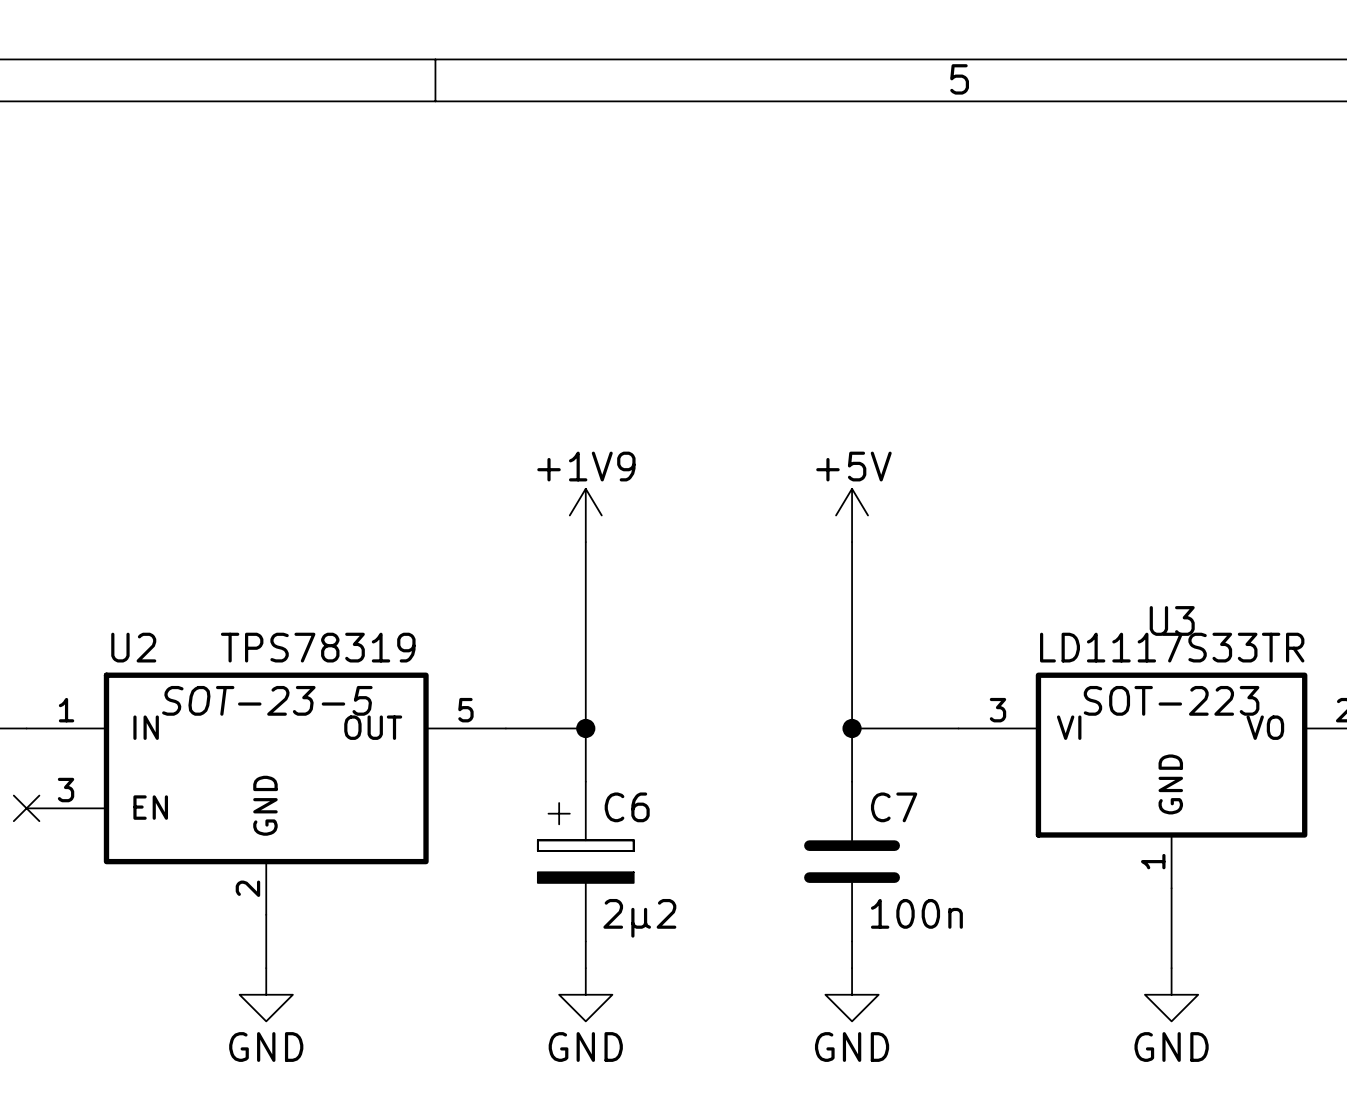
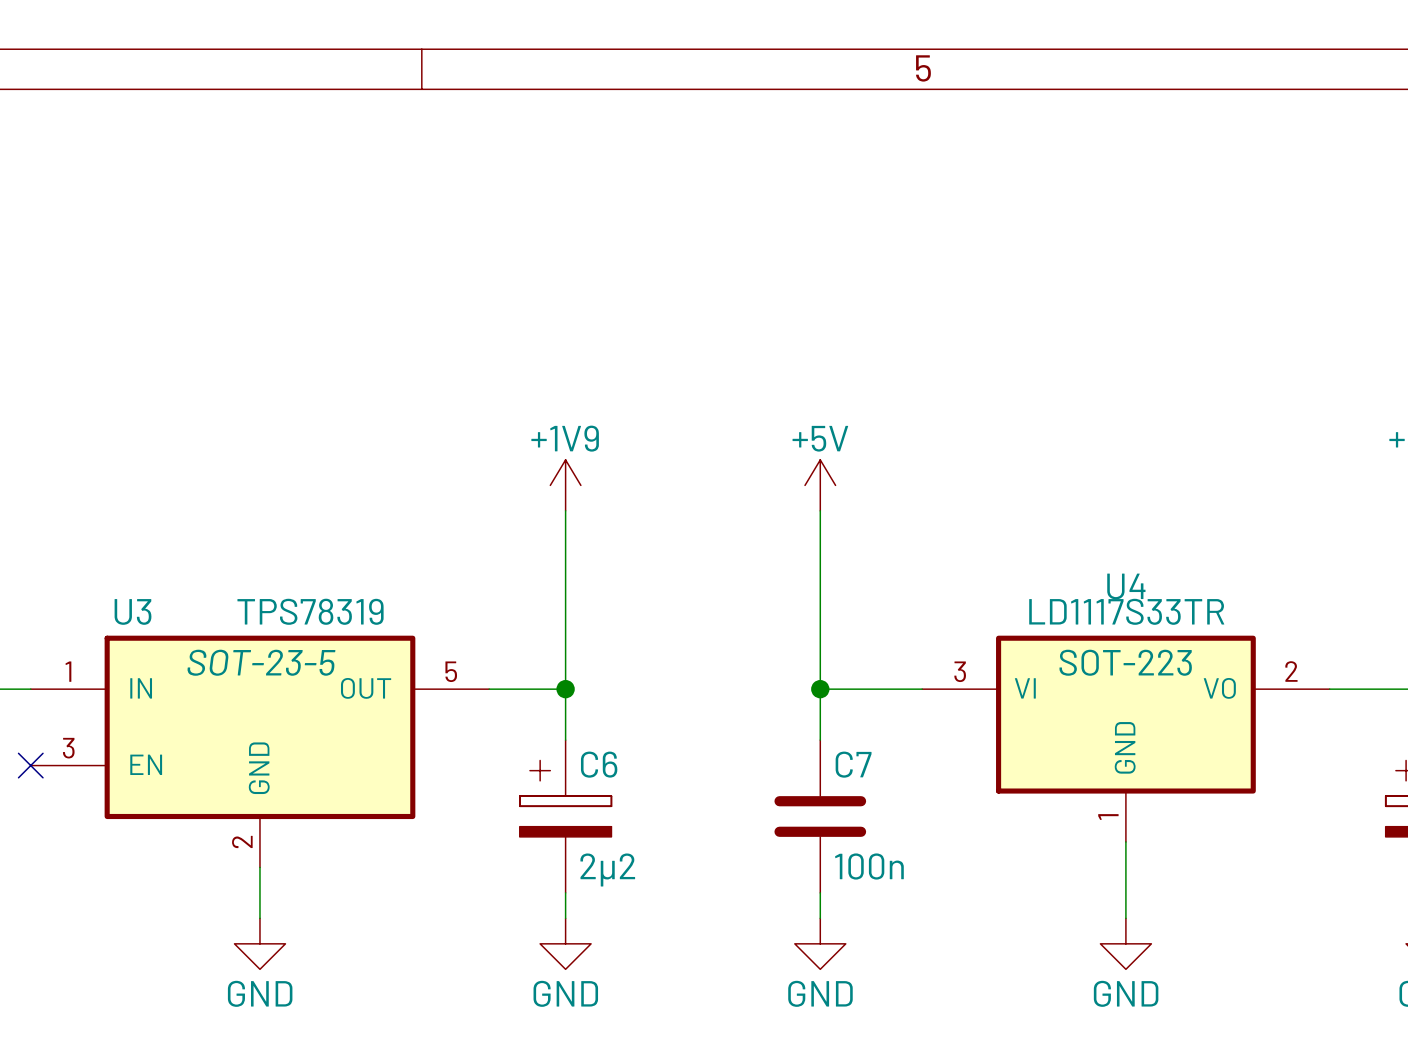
U3 name: U3 (1172, 620) -> U4 (1126, 586)
U2 name: U2 (133, 647) -> U3 (133, 611)

